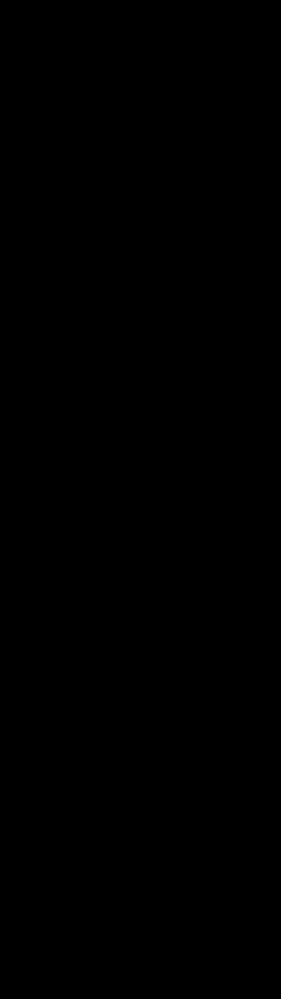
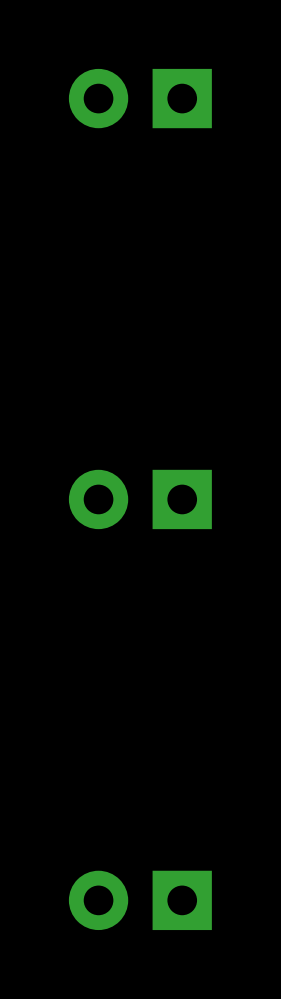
part: none -> (140, 98)
part: none -> (140, 499)
part: none -> (140, 900)

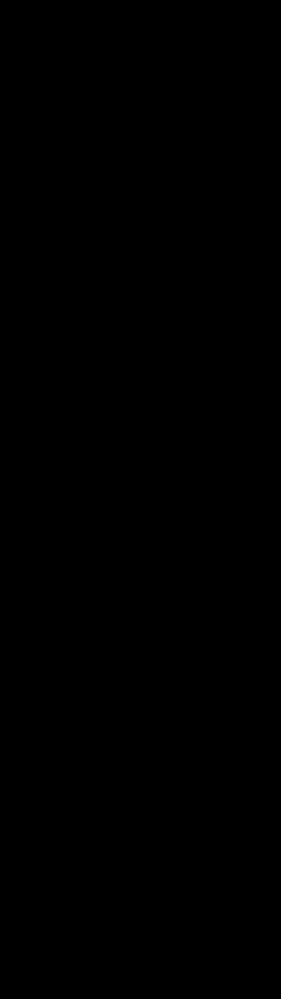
part: (140, 98) -> none
part: (140, 499) -> none
part: (140, 900) -> none

